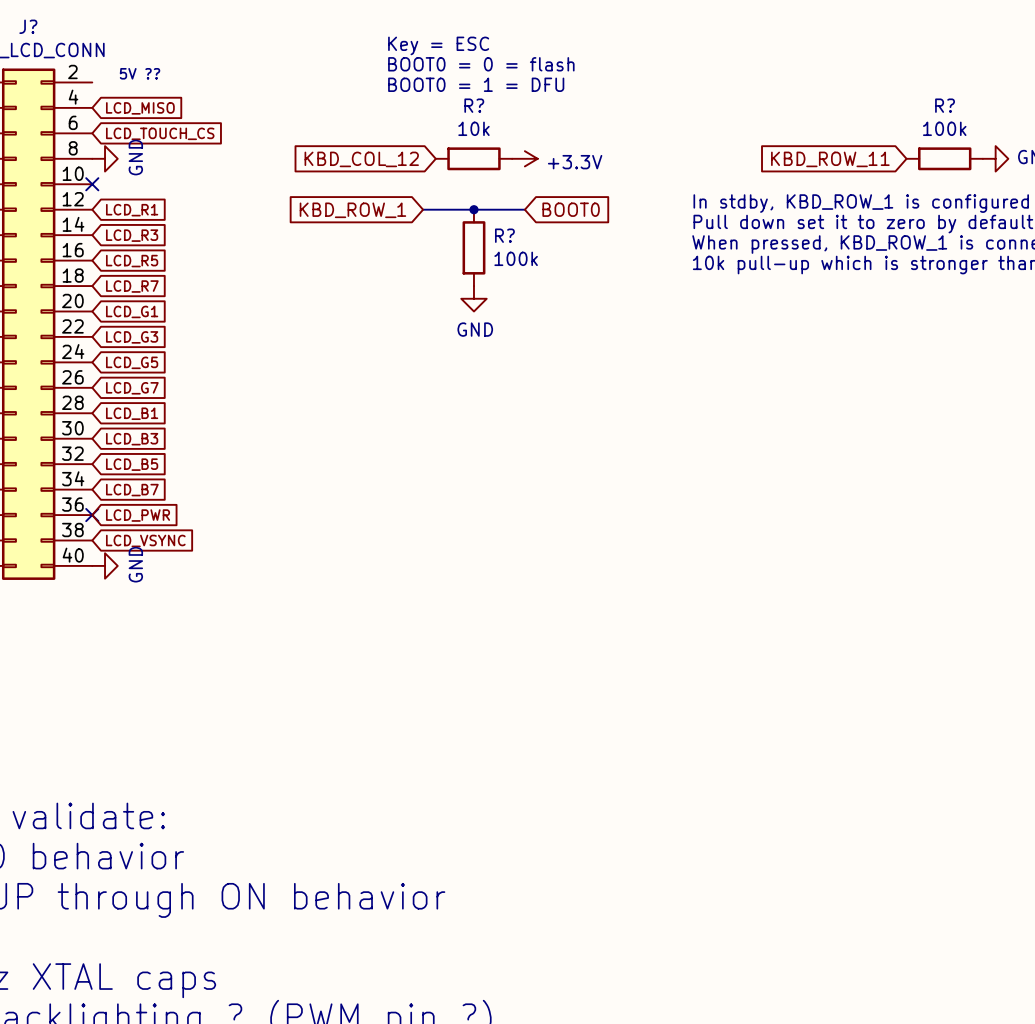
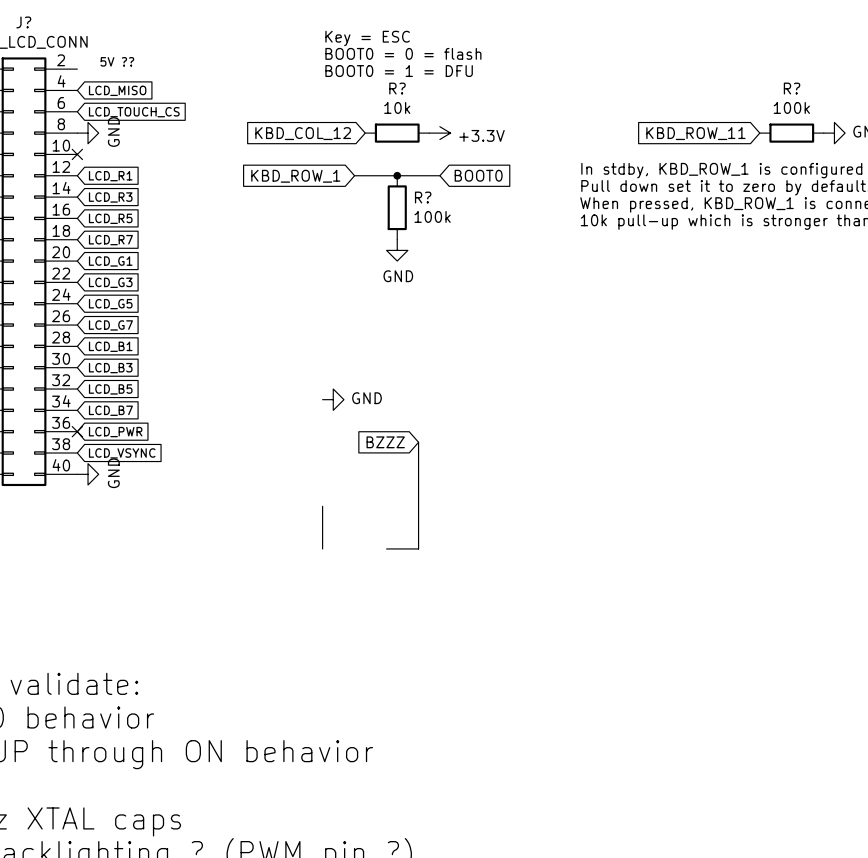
power symbol: none -> GND (333, 399)
global label: none -> BZZZ (385, 442)
wire: none -> (418, 442) (418, 548) (386, 548)
wire: none -> (322, 506) (322, 548)

